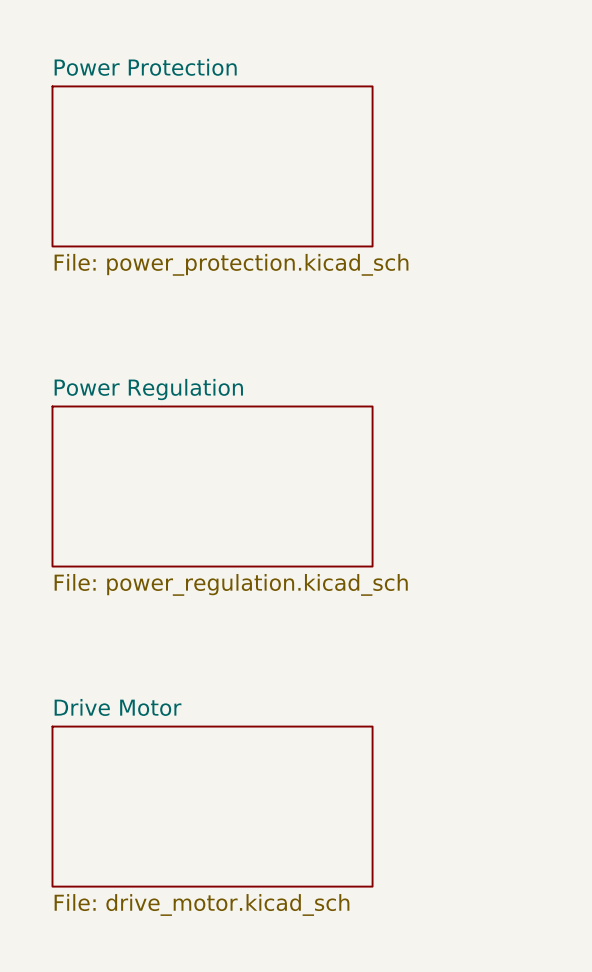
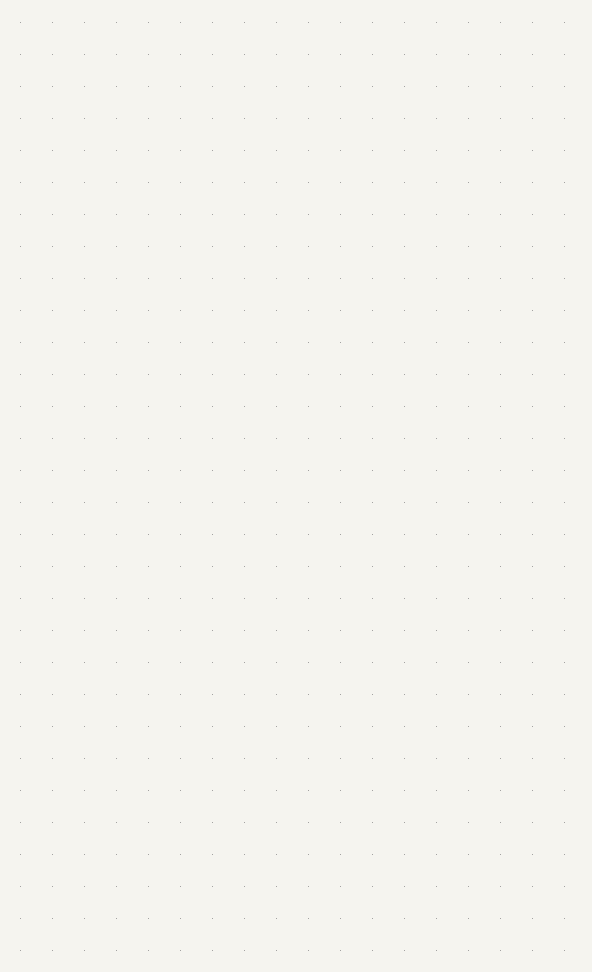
sheet Power Protection: File: power_protection.kicad_sch (212, 166) -> none
sheet Power Regulation: File: power_regulation.kicad_sch (212, 486) -> none
sheet Drive Motor: File: drive_motor.kicad_sch (212, 806) -> none

